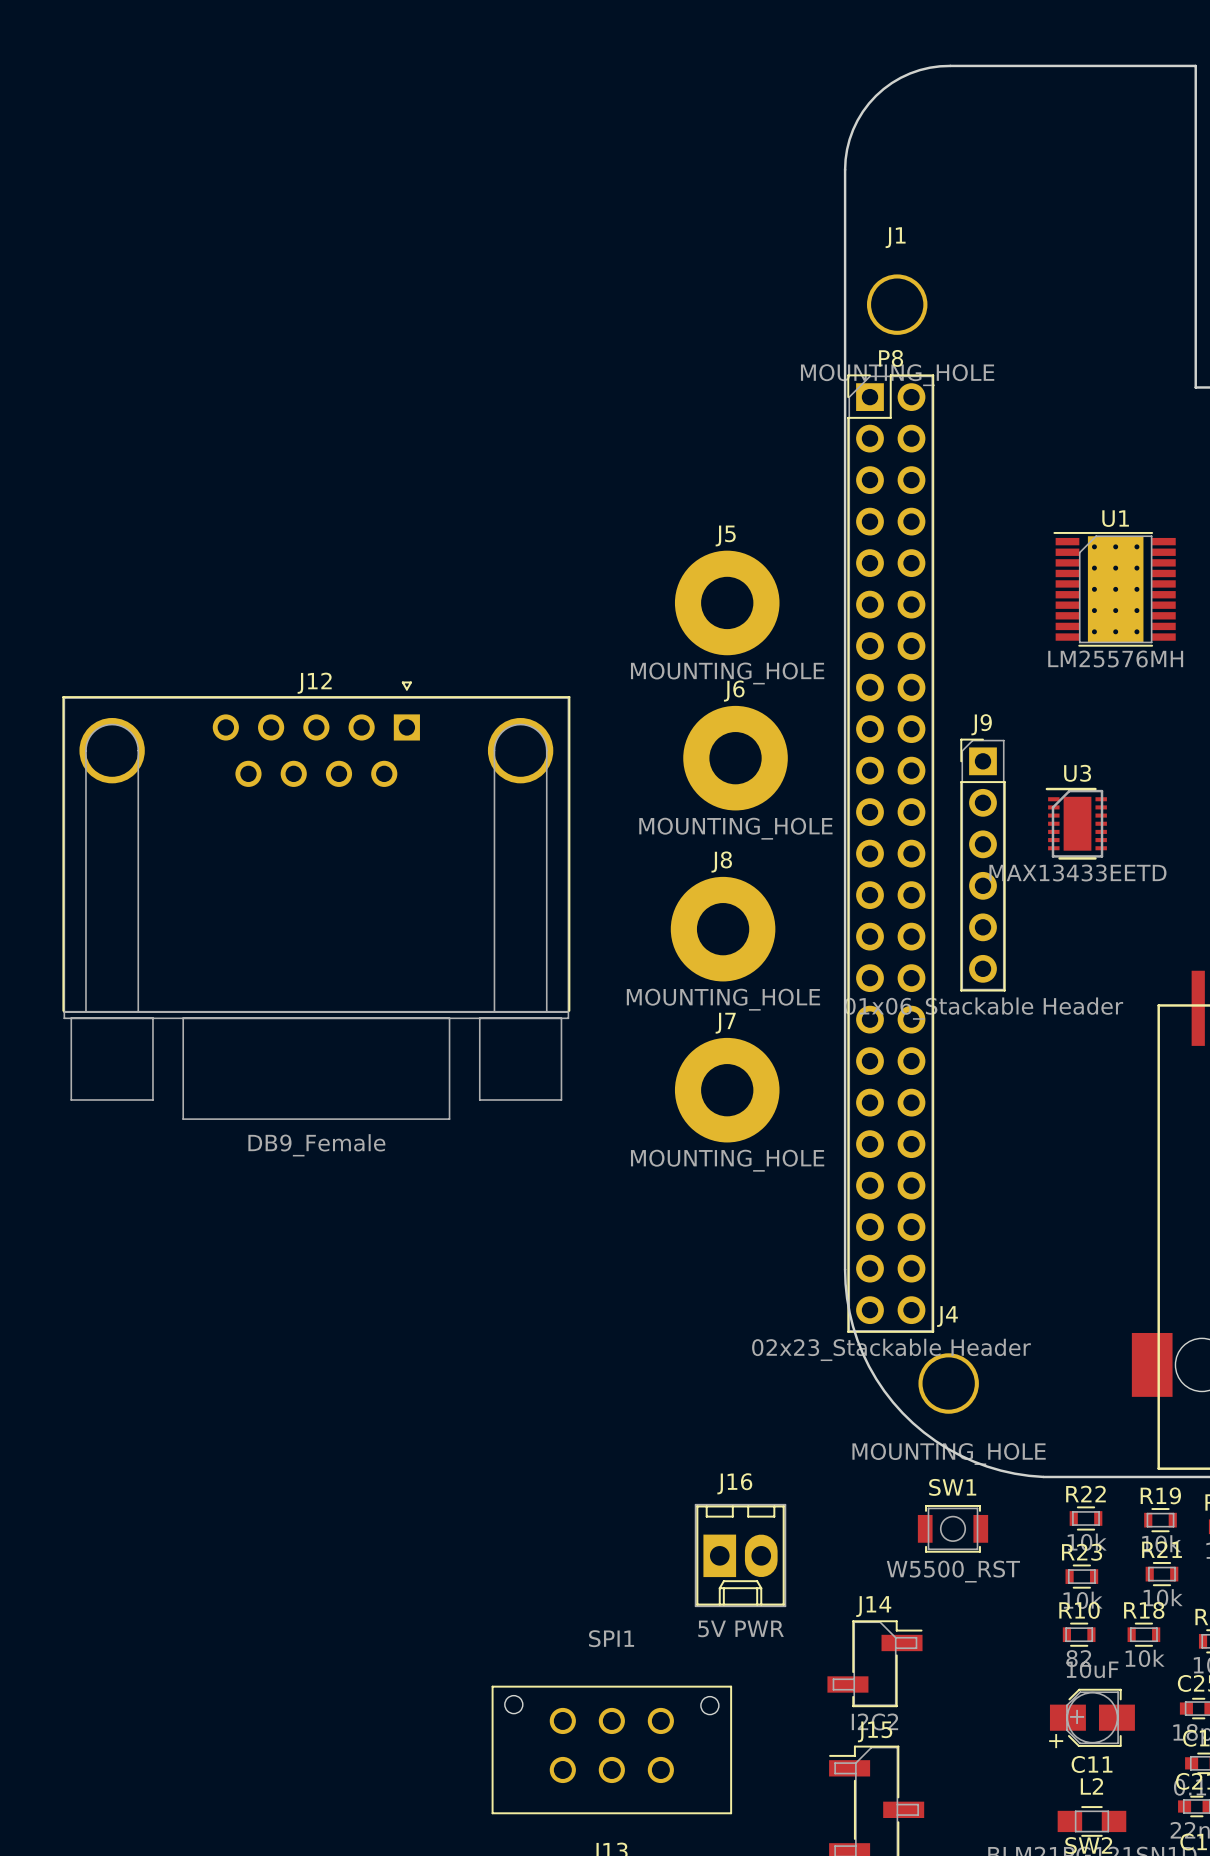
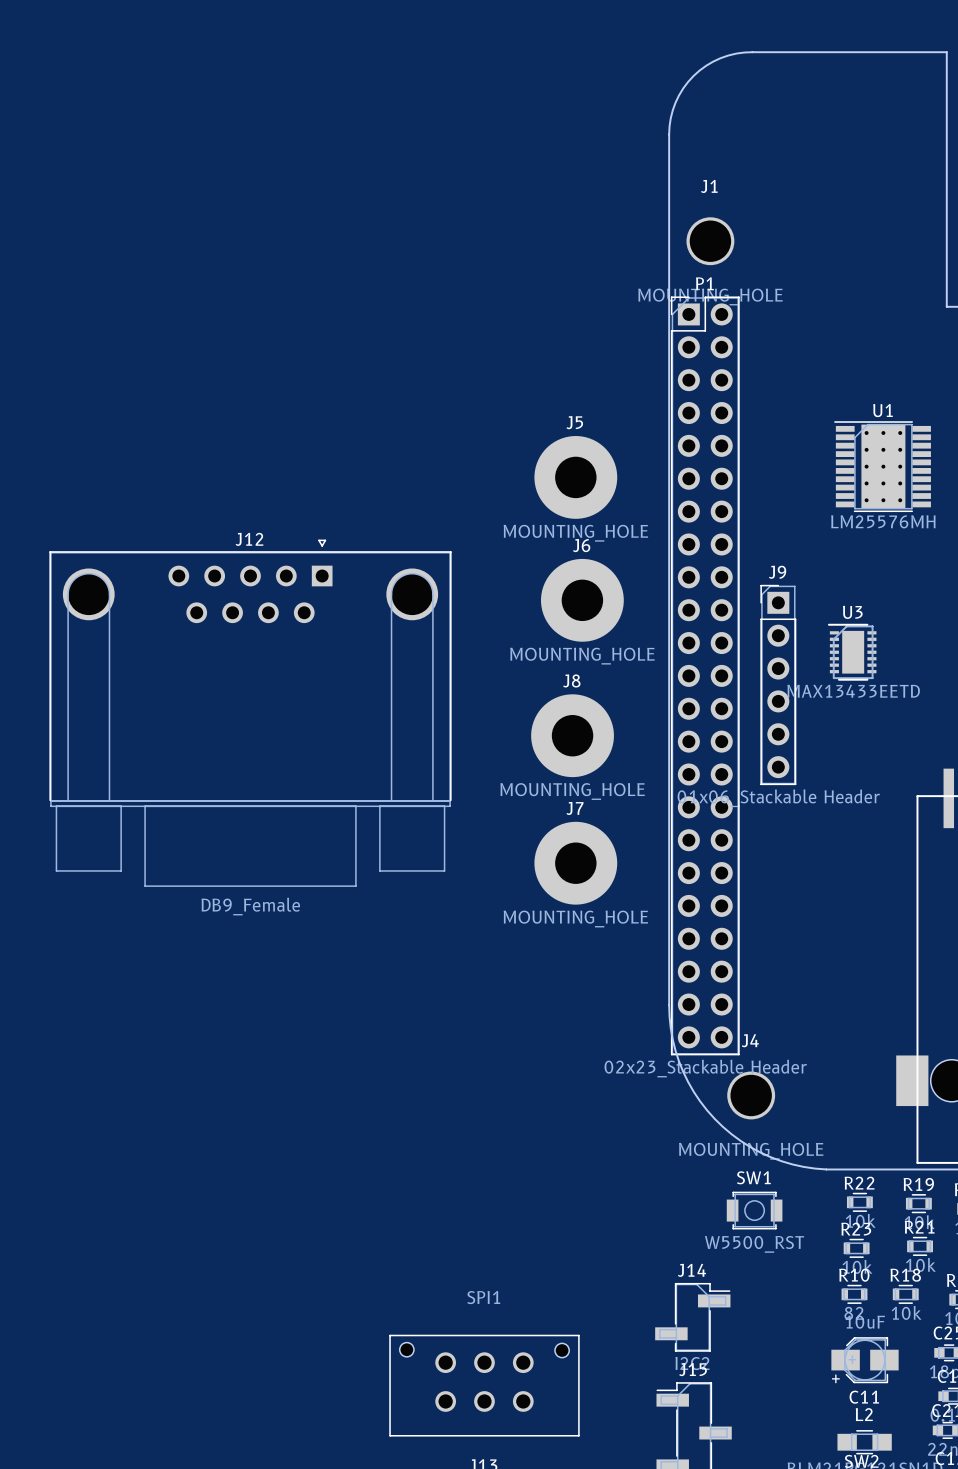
P8 name: P8 (891, 358) -> P1 (704, 283)
J16: 5V PWR (740, 1555) -> none

